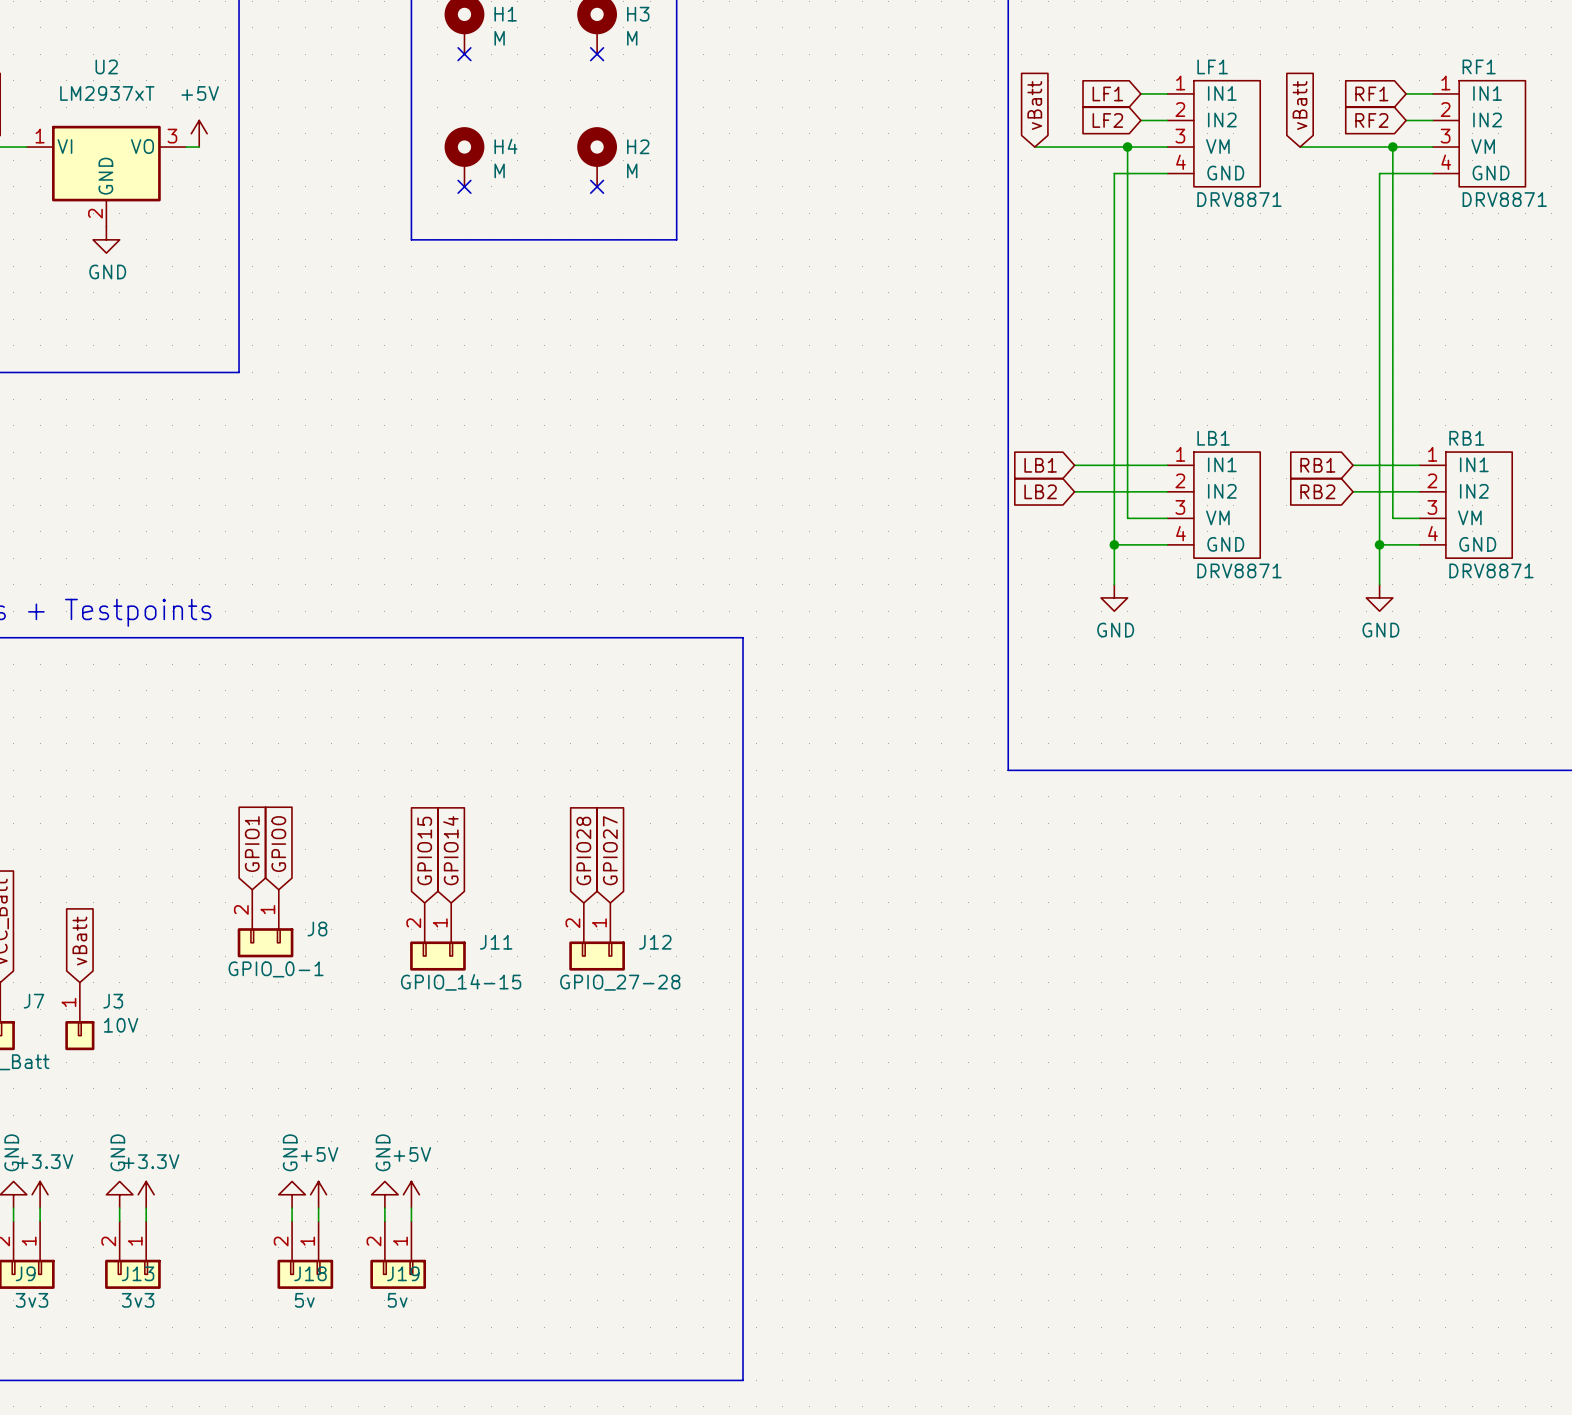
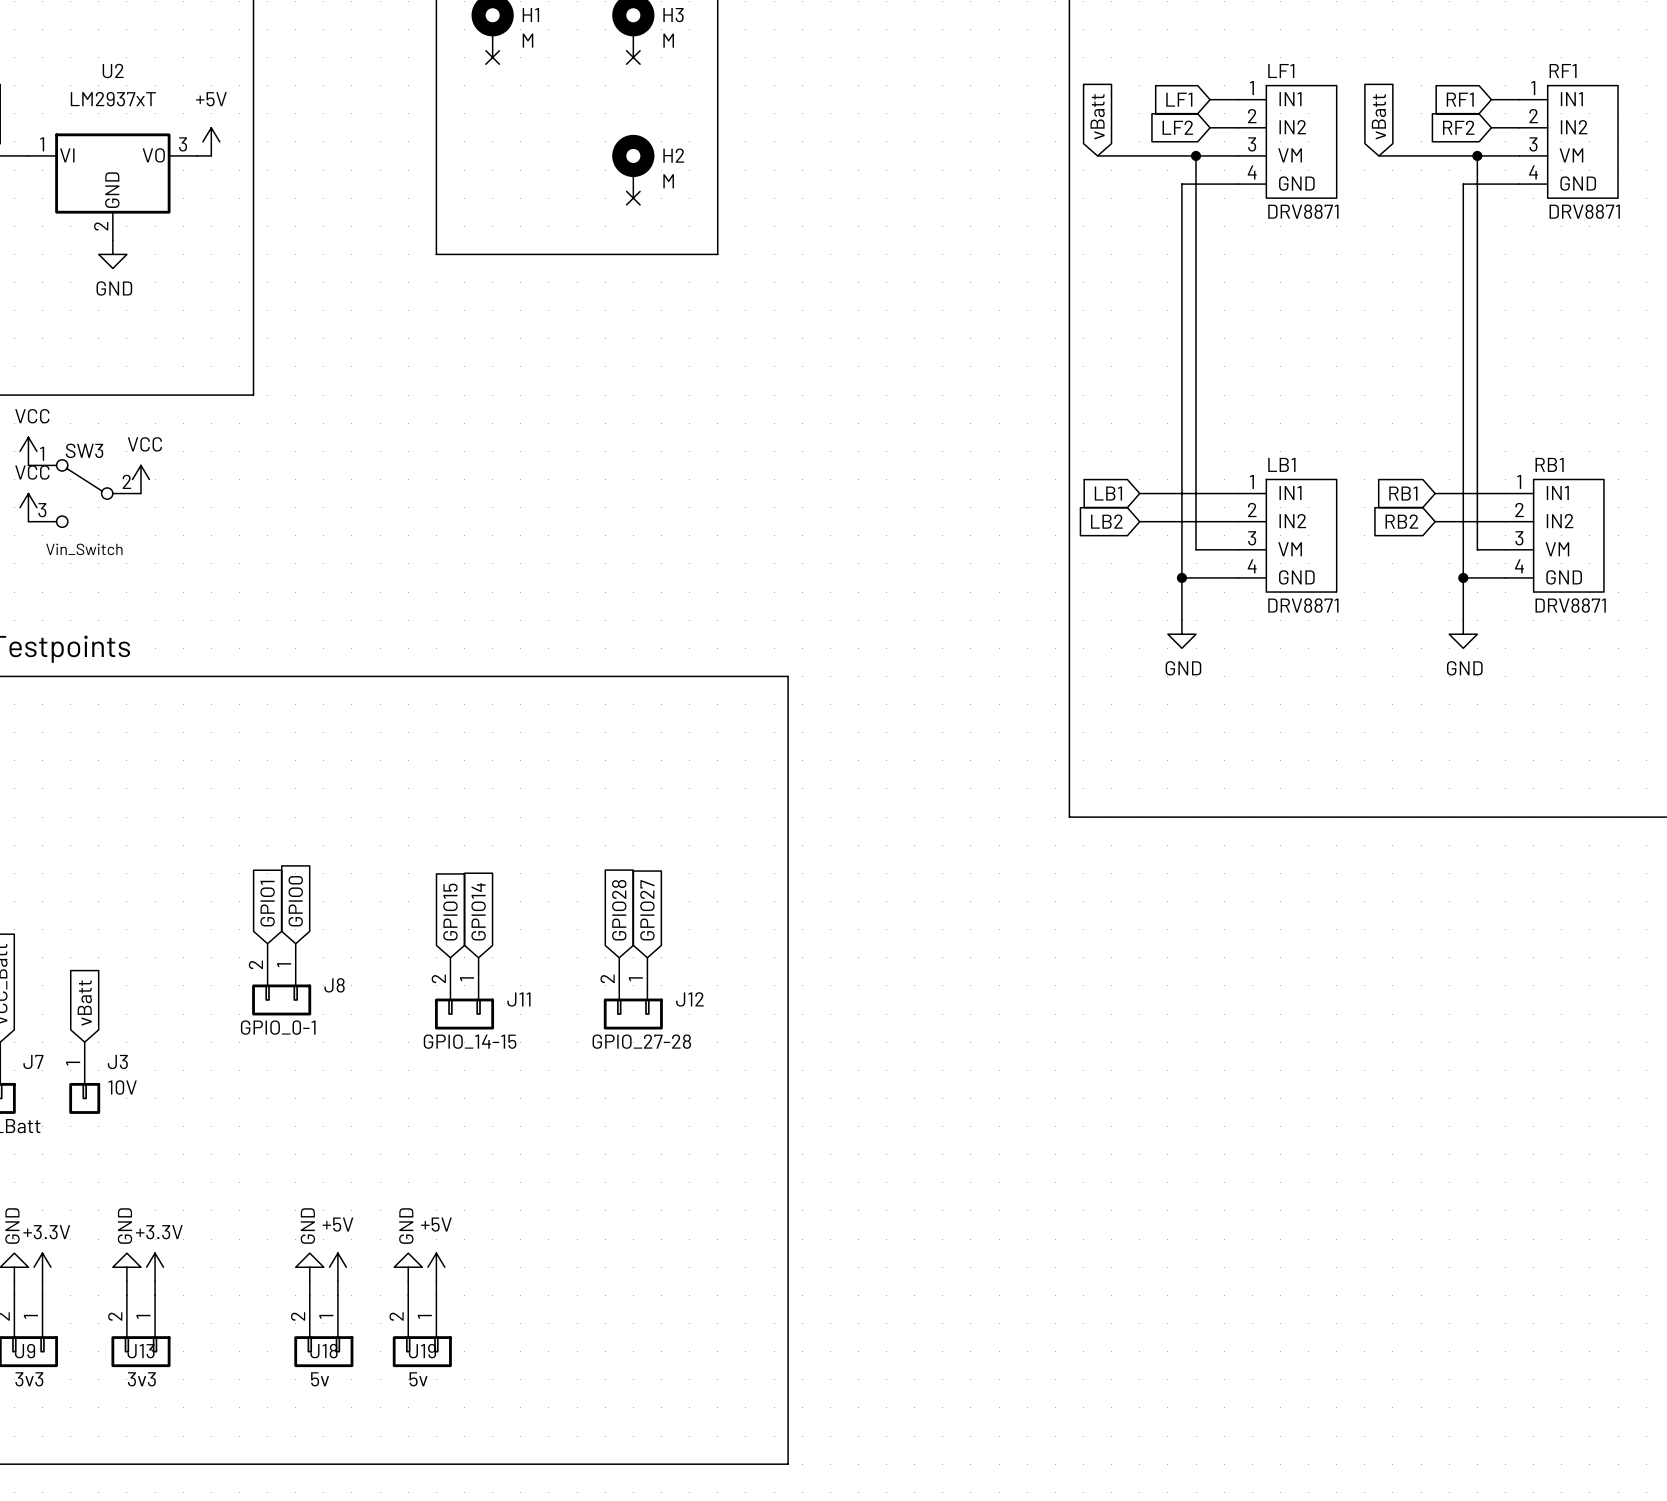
H4: M (464, 156) -> none
no-connect mark: (464, 186) -> none
power symbol: none -> VCC (28, 451)
power symbol: none -> VCC (140, 479)
SW3: none -> Vin_Switch (84, 493)
power symbol: none -> VCC (28, 507)

